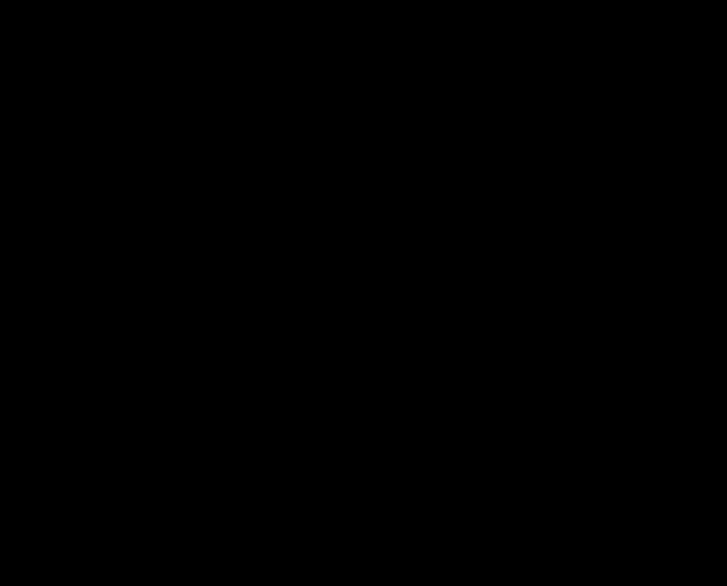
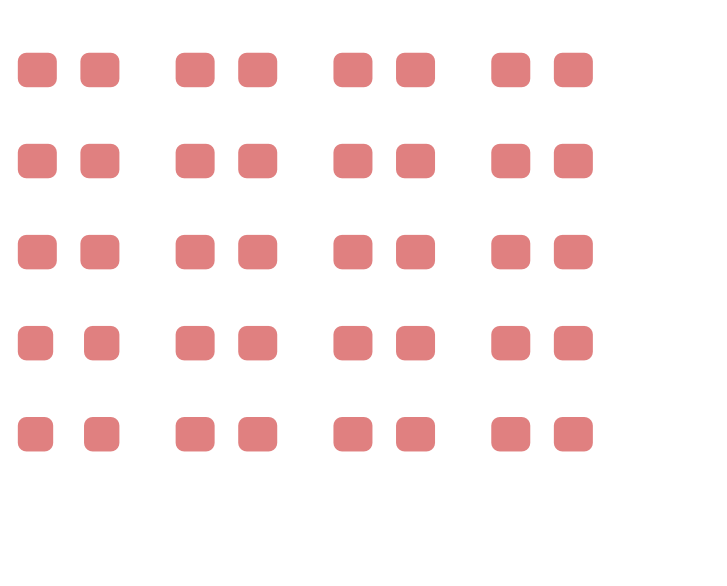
part: none -> (68, 69)
part: none -> (226, 69)
part: none -> (384, 69)
part: none -> (542, 69)
part: none -> (68, 161)
part: none -> (226, 161)
part: none -> (384, 161)
part: none -> (542, 161)
part: none -> (68, 252)
part: none -> (226, 252)
part: none -> (384, 252)
part: none -> (542, 252)
part: none -> (68, 343)
part: none -> (226, 343)
part: none -> (384, 343)
part: none -> (542, 343)
part: none -> (68, 434)
part: none -> (226, 434)
part: none -> (384, 434)
part: none -> (542, 434)

